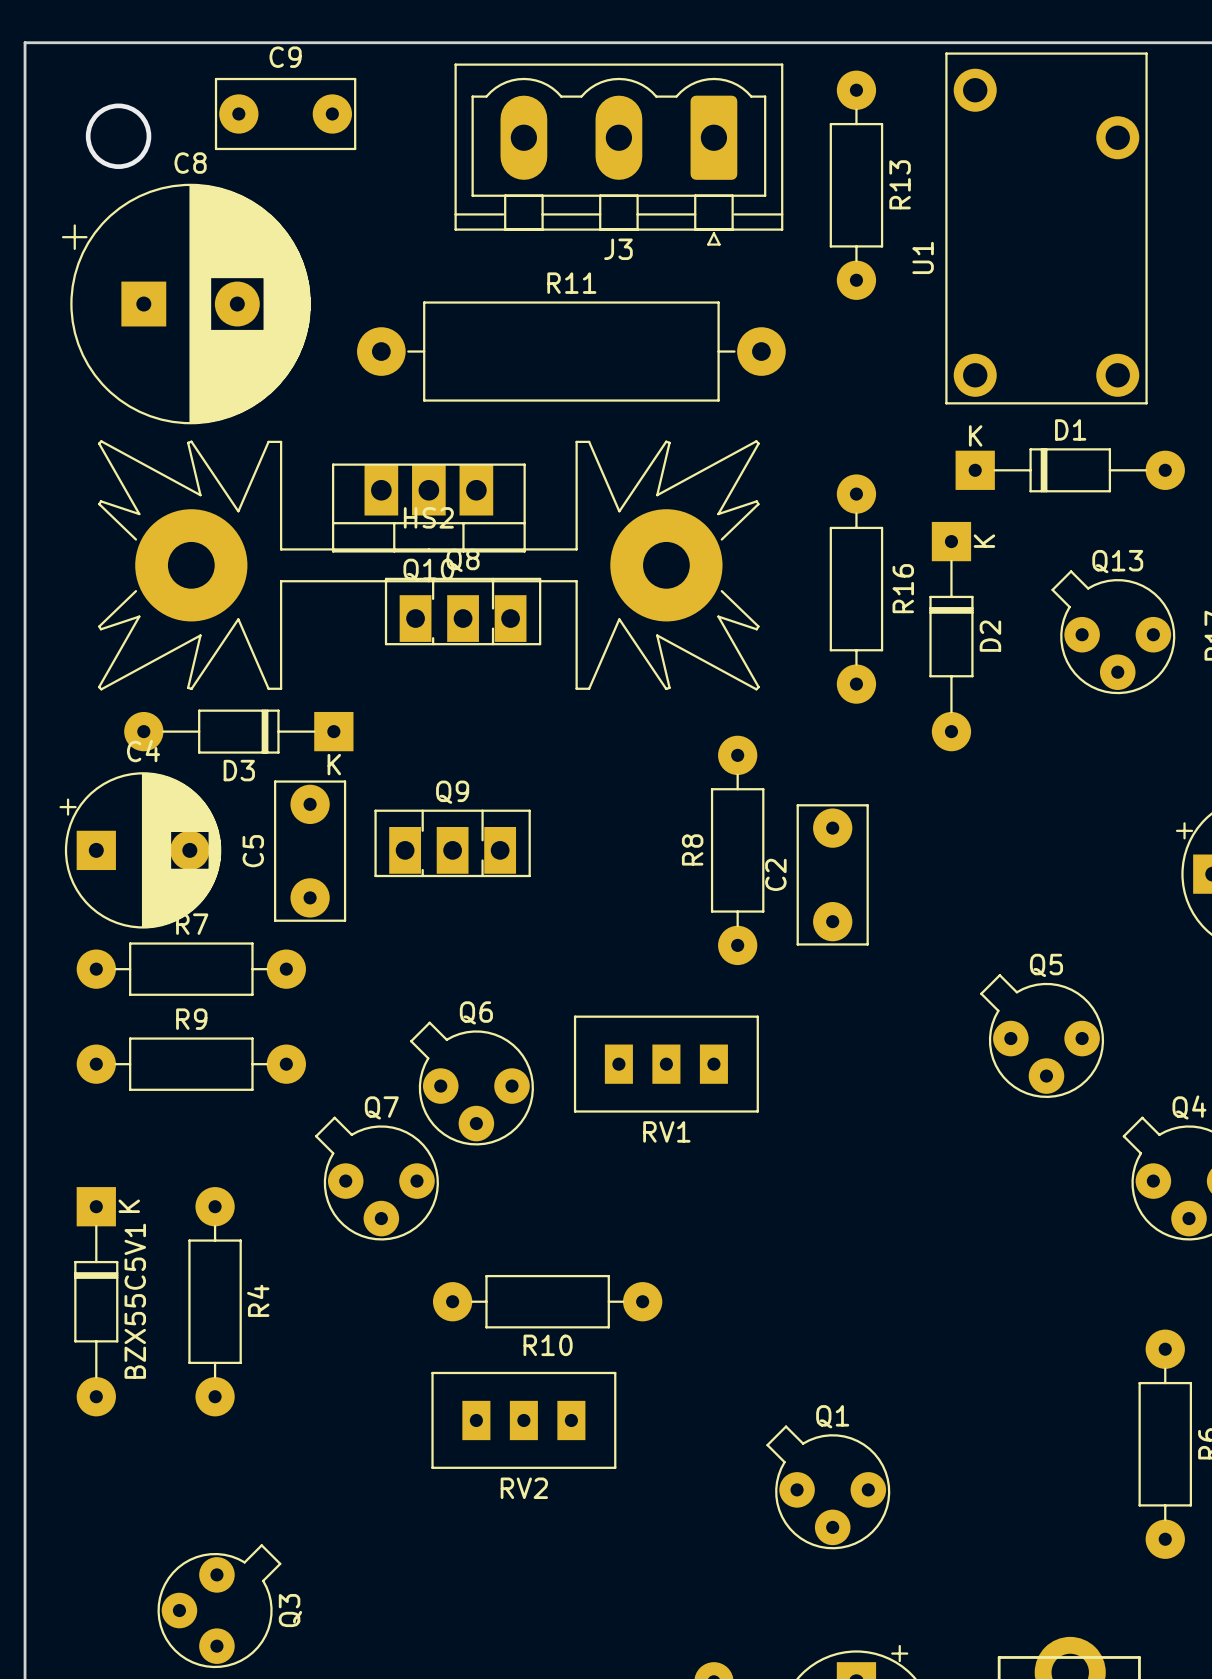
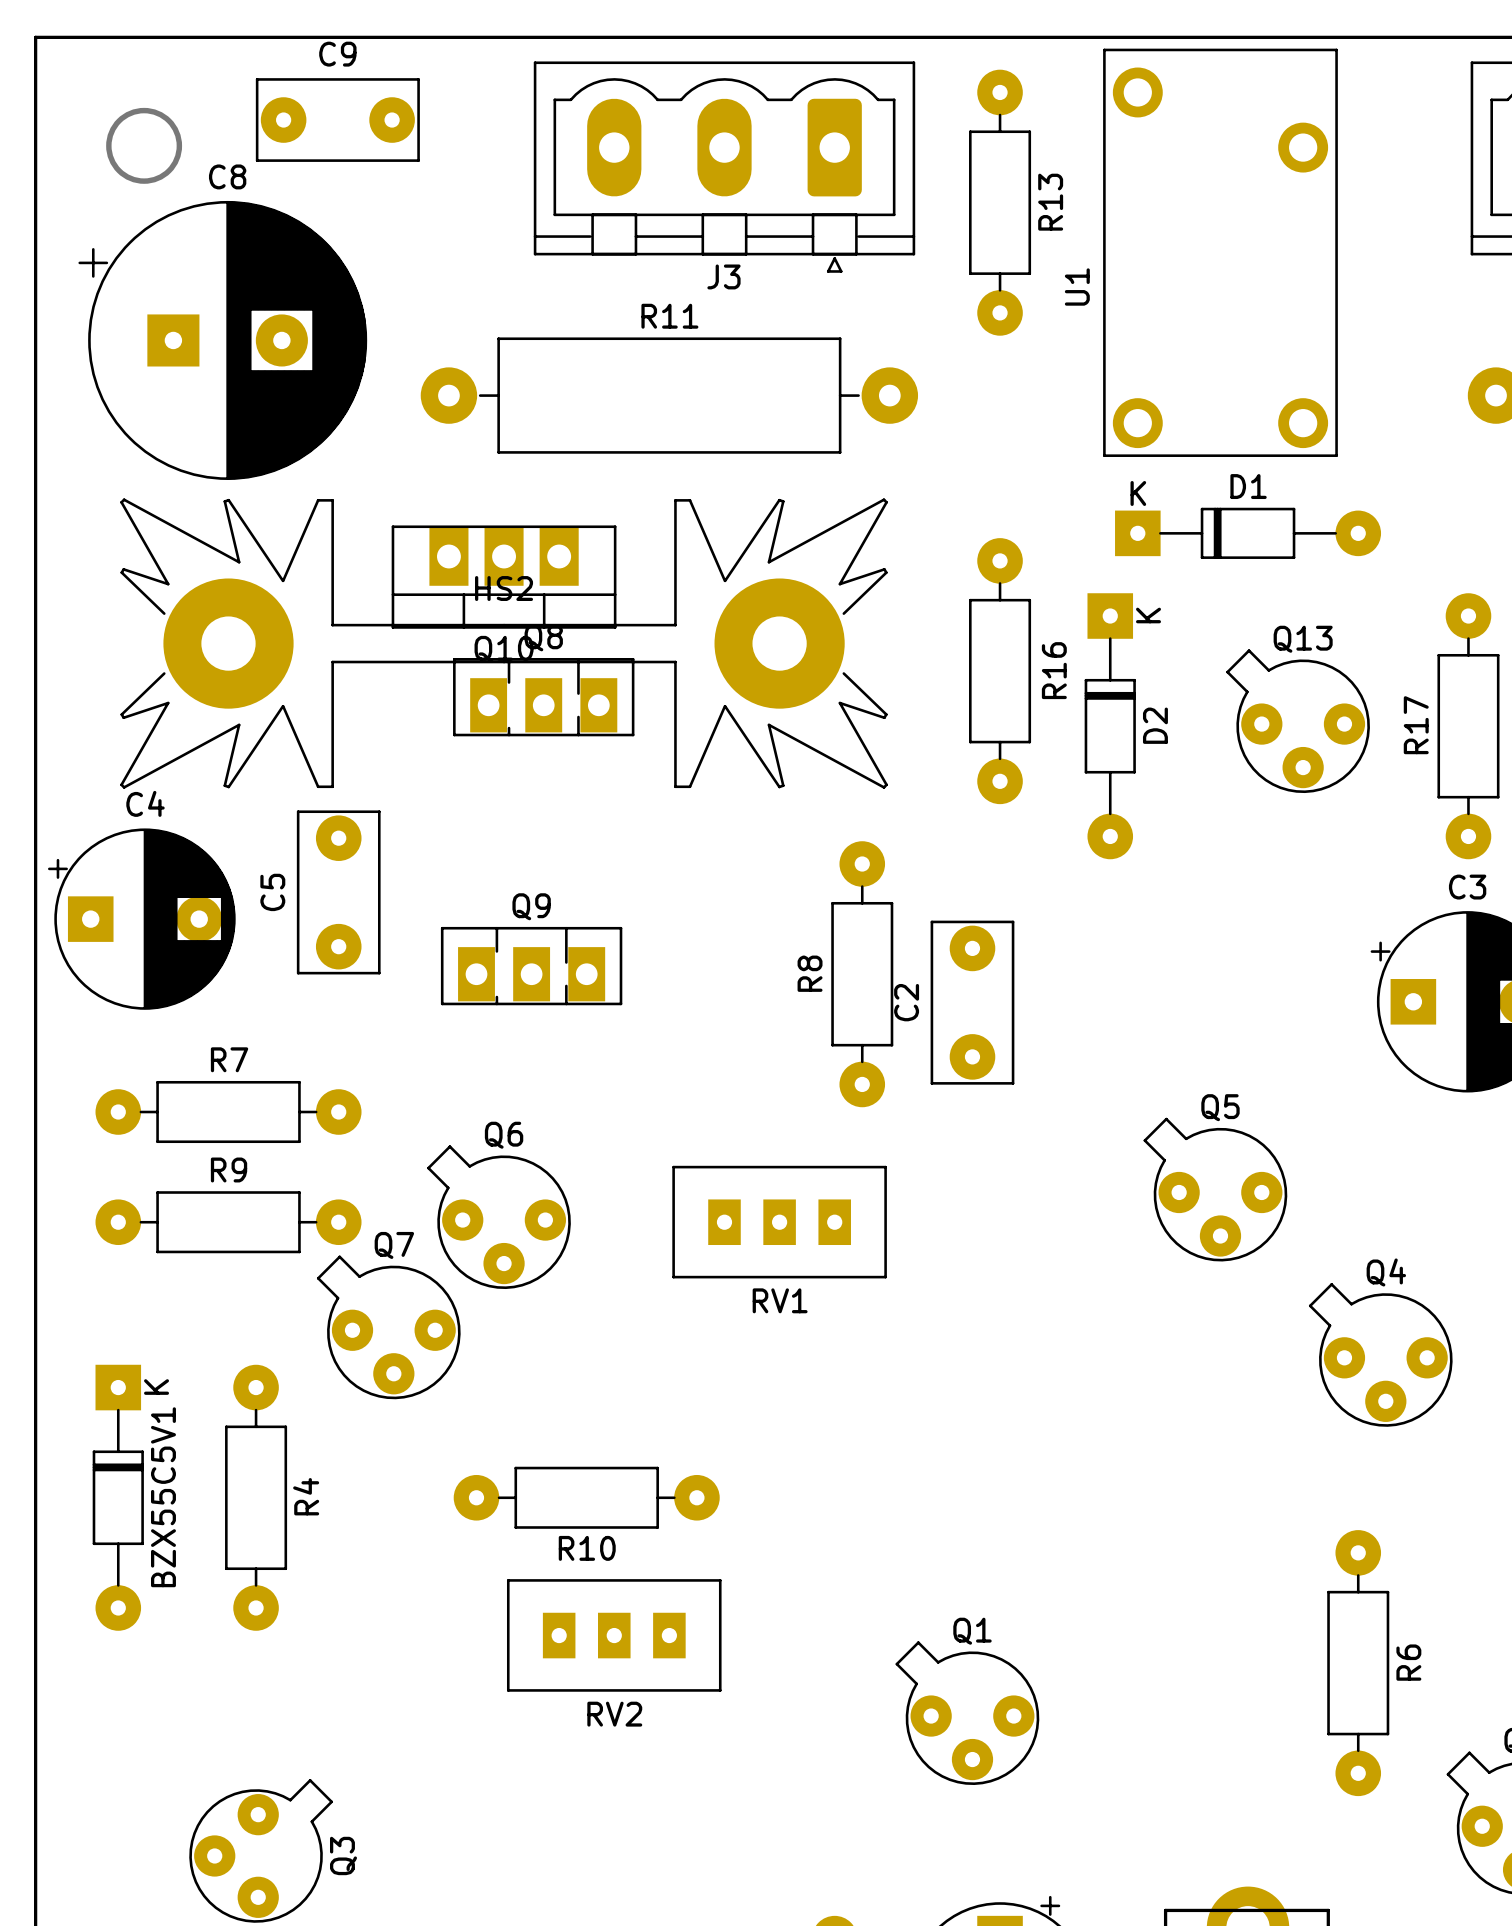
D3: (238, 731) -> none
C4 position: (140, 850) -> (141, 919)
C5 position: (310, 851) -> (338, 892)
Q6 position: (472, 1083) -> (499, 1217)
Q7 position: (377, 1178) -> (388, 1327)
R10 position: (547, 1301) -> (586, 1497)

